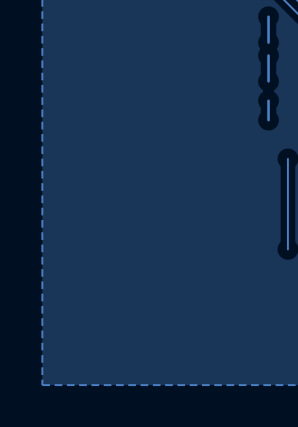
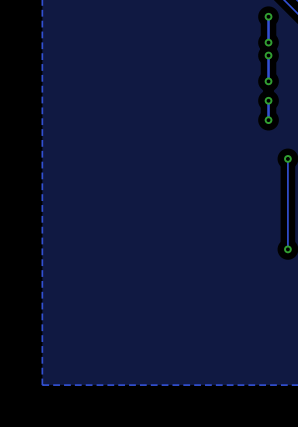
via: none -> (268, 16)
via: none -> (268, 42)
via: none -> (268, 55)
via: none -> (268, 81)
via: none -> (268, 100)
via: none -> (268, 120)
via: none -> (287, 158)
via: none -> (287, 249)

